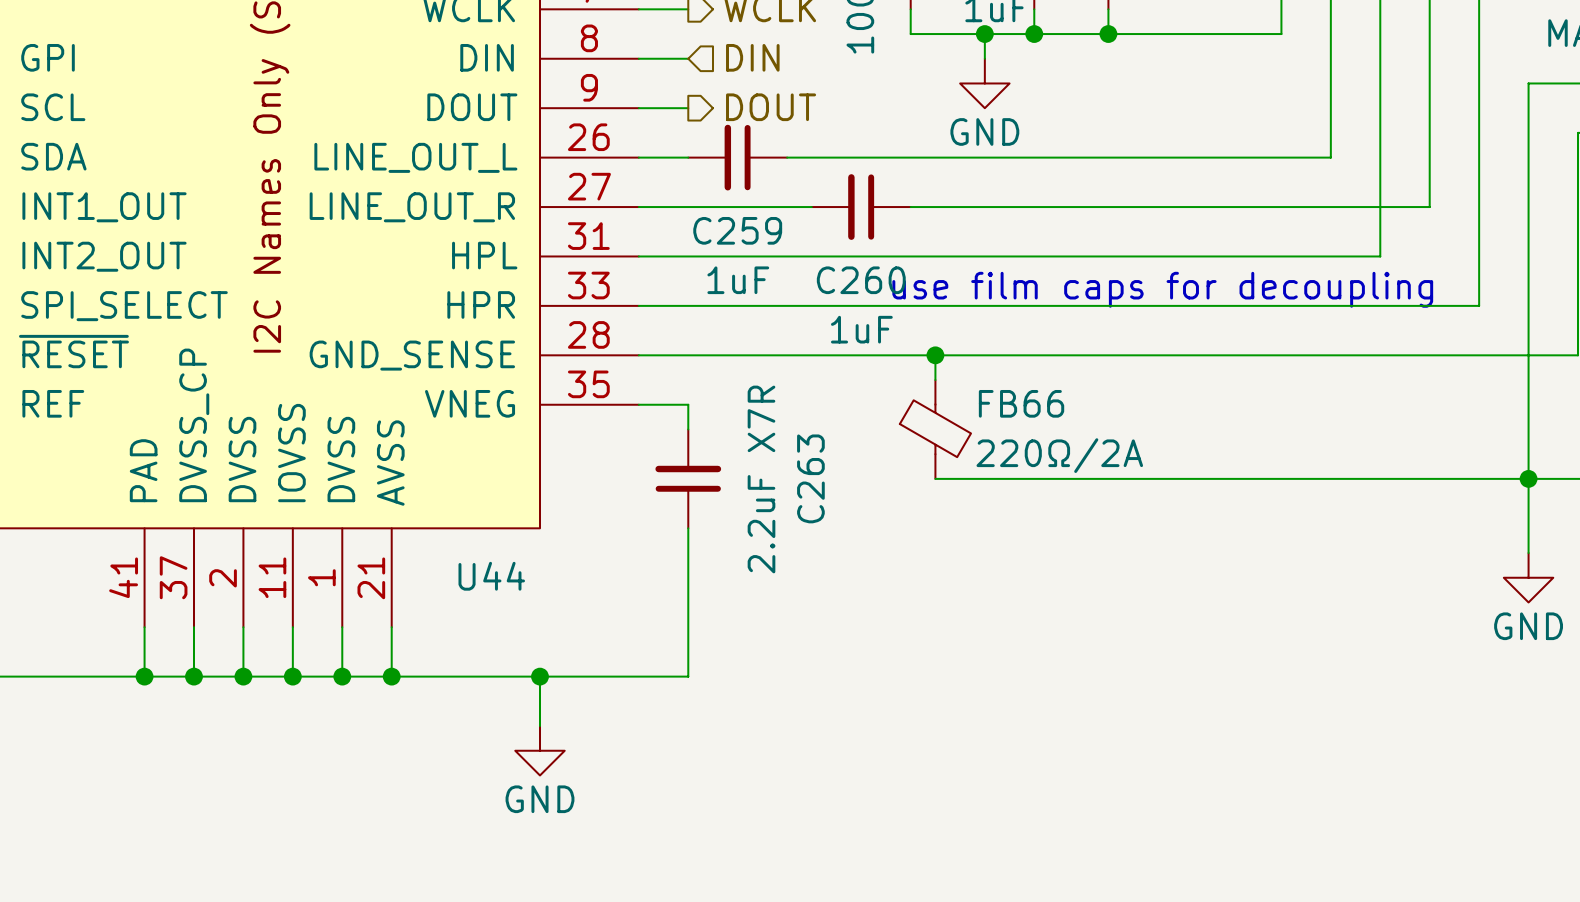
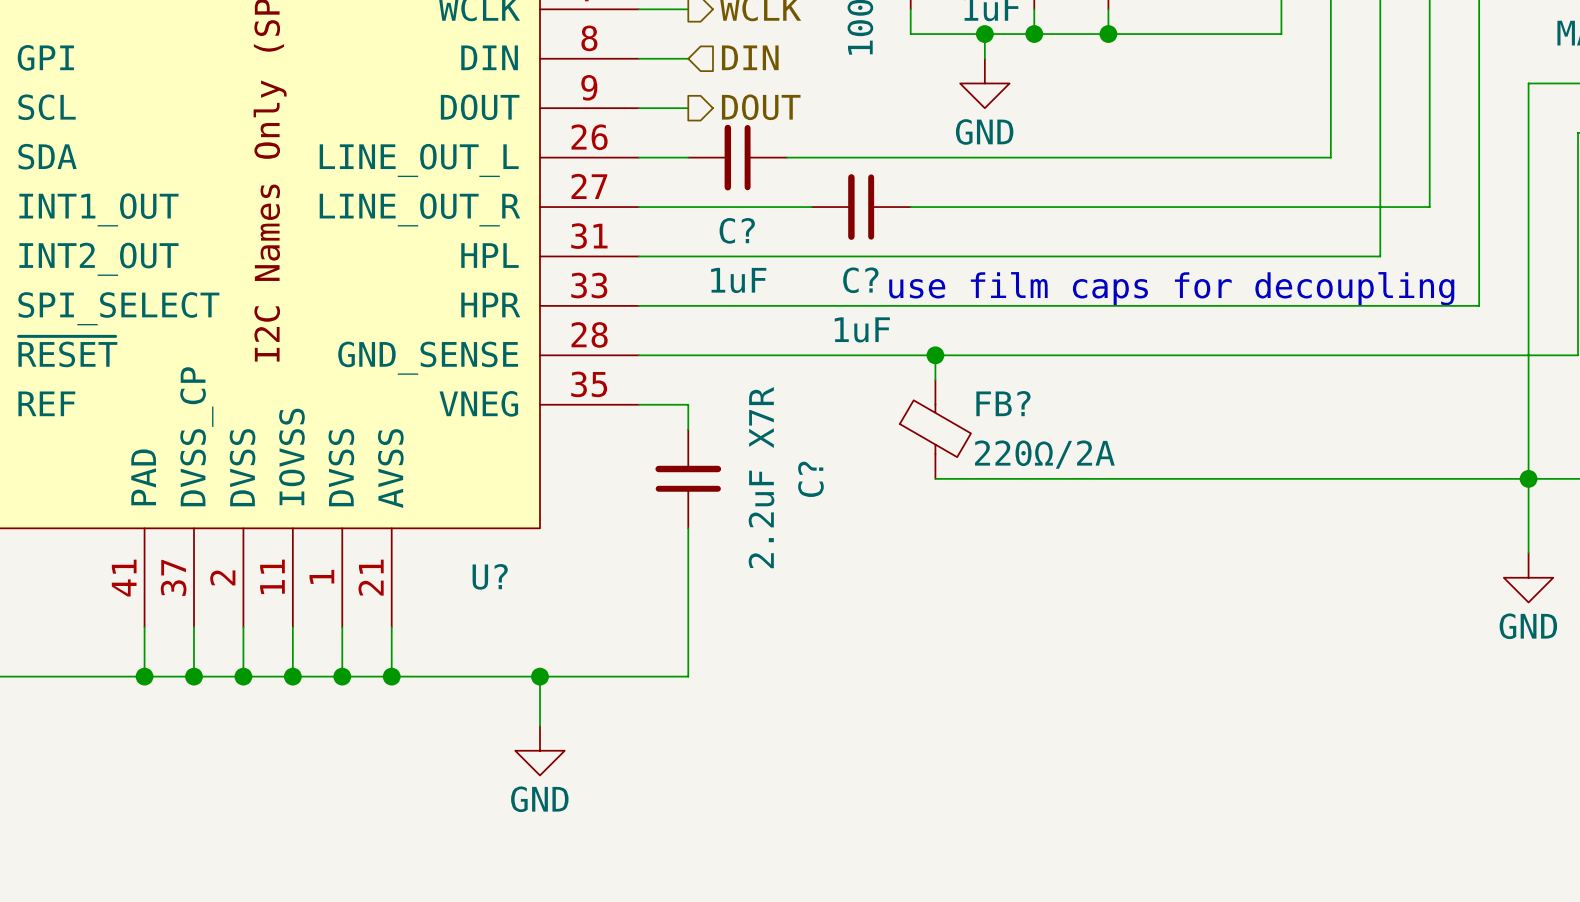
C259 name: C259 (737, 230) -> C? (737, 230)
C260 name: C260 (861, 280) -> C? (860, 280)
FB66 name: FB66 (1021, 403) -> FB? (1003, 403)
C263 name: C263 (810, 478) -> C? (810, 479)
U44 name: U44 (491, 576) -> U? (490, 576)

